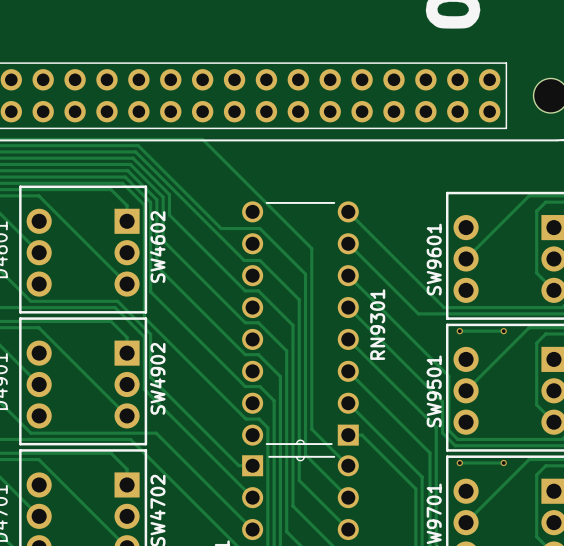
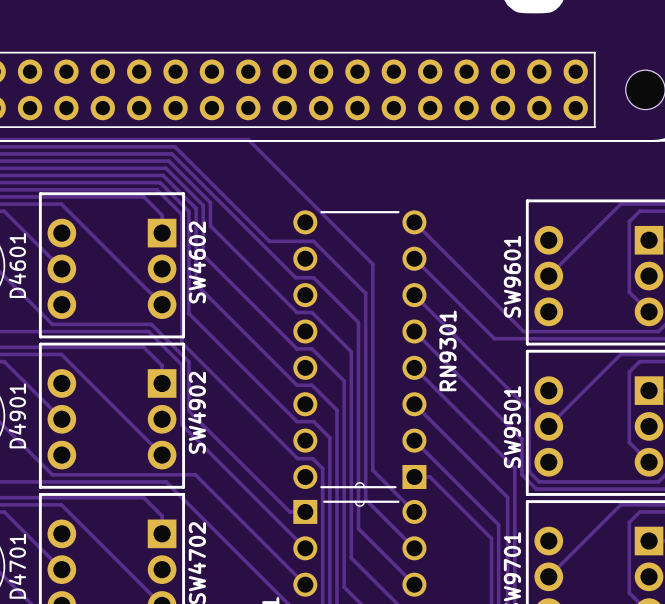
track: (459, 331) (503, 331) -> none
via: (459, 331) -> none
via: (503, 331) -> none
track: (459, 462) (503, 462) -> none
via: (459, 462) -> none
via: (503, 462) -> none

